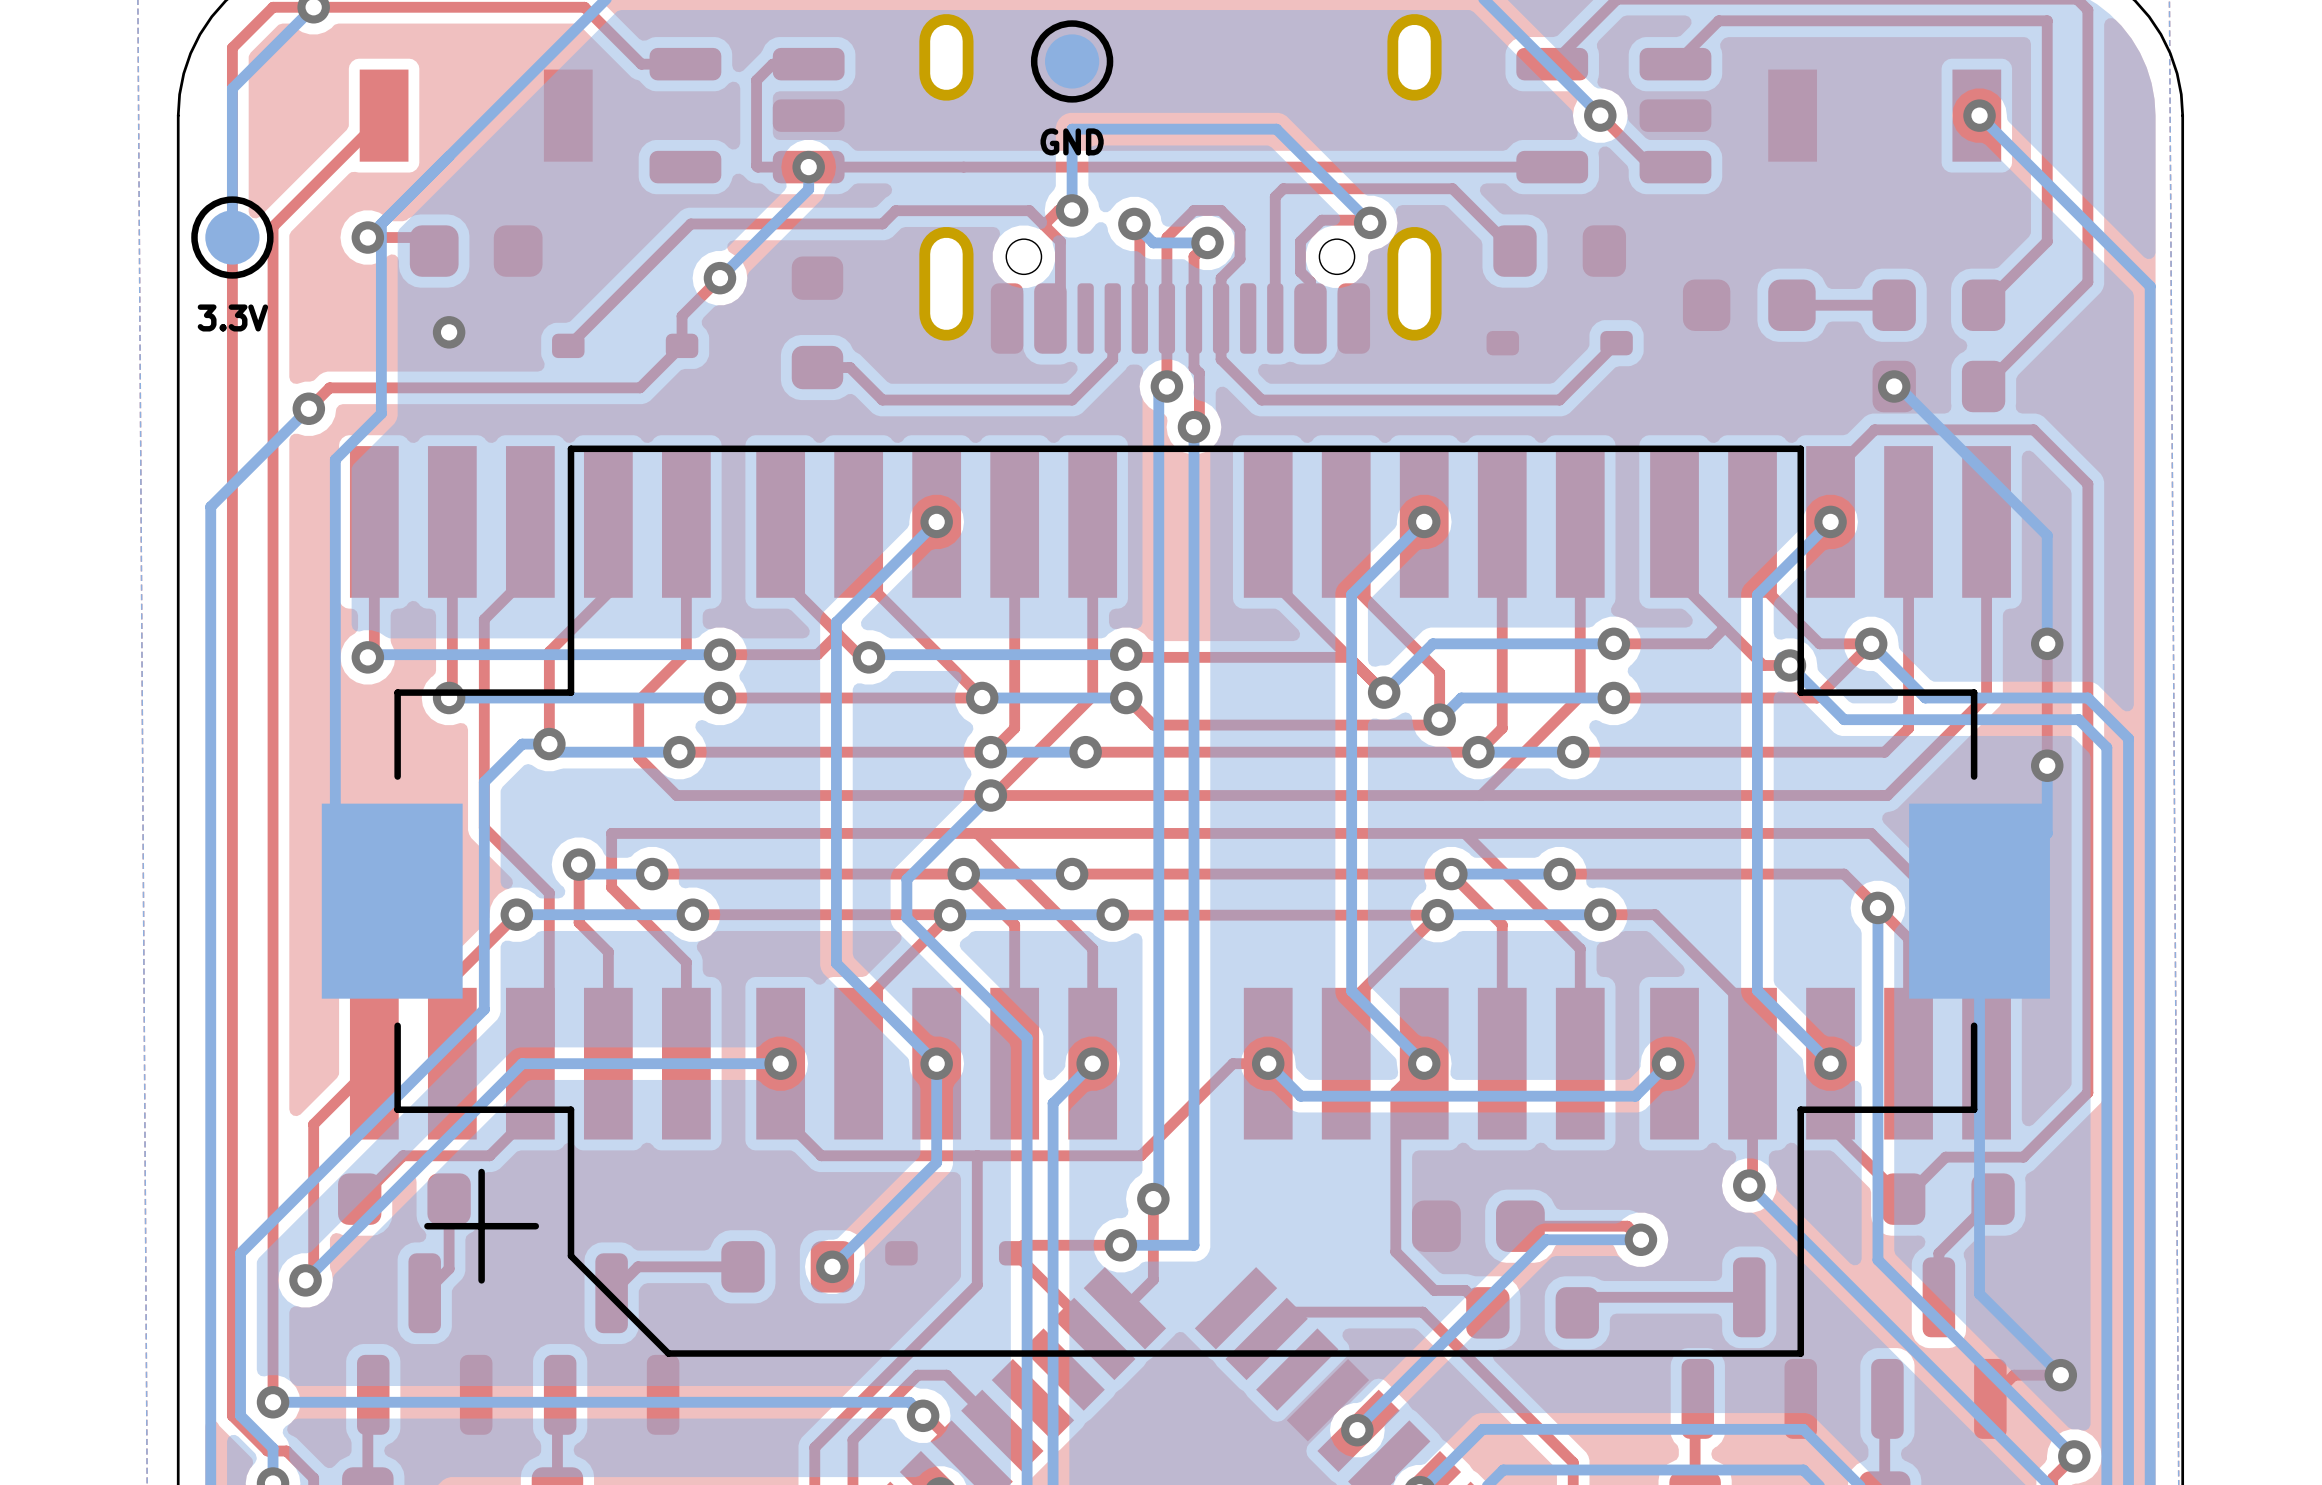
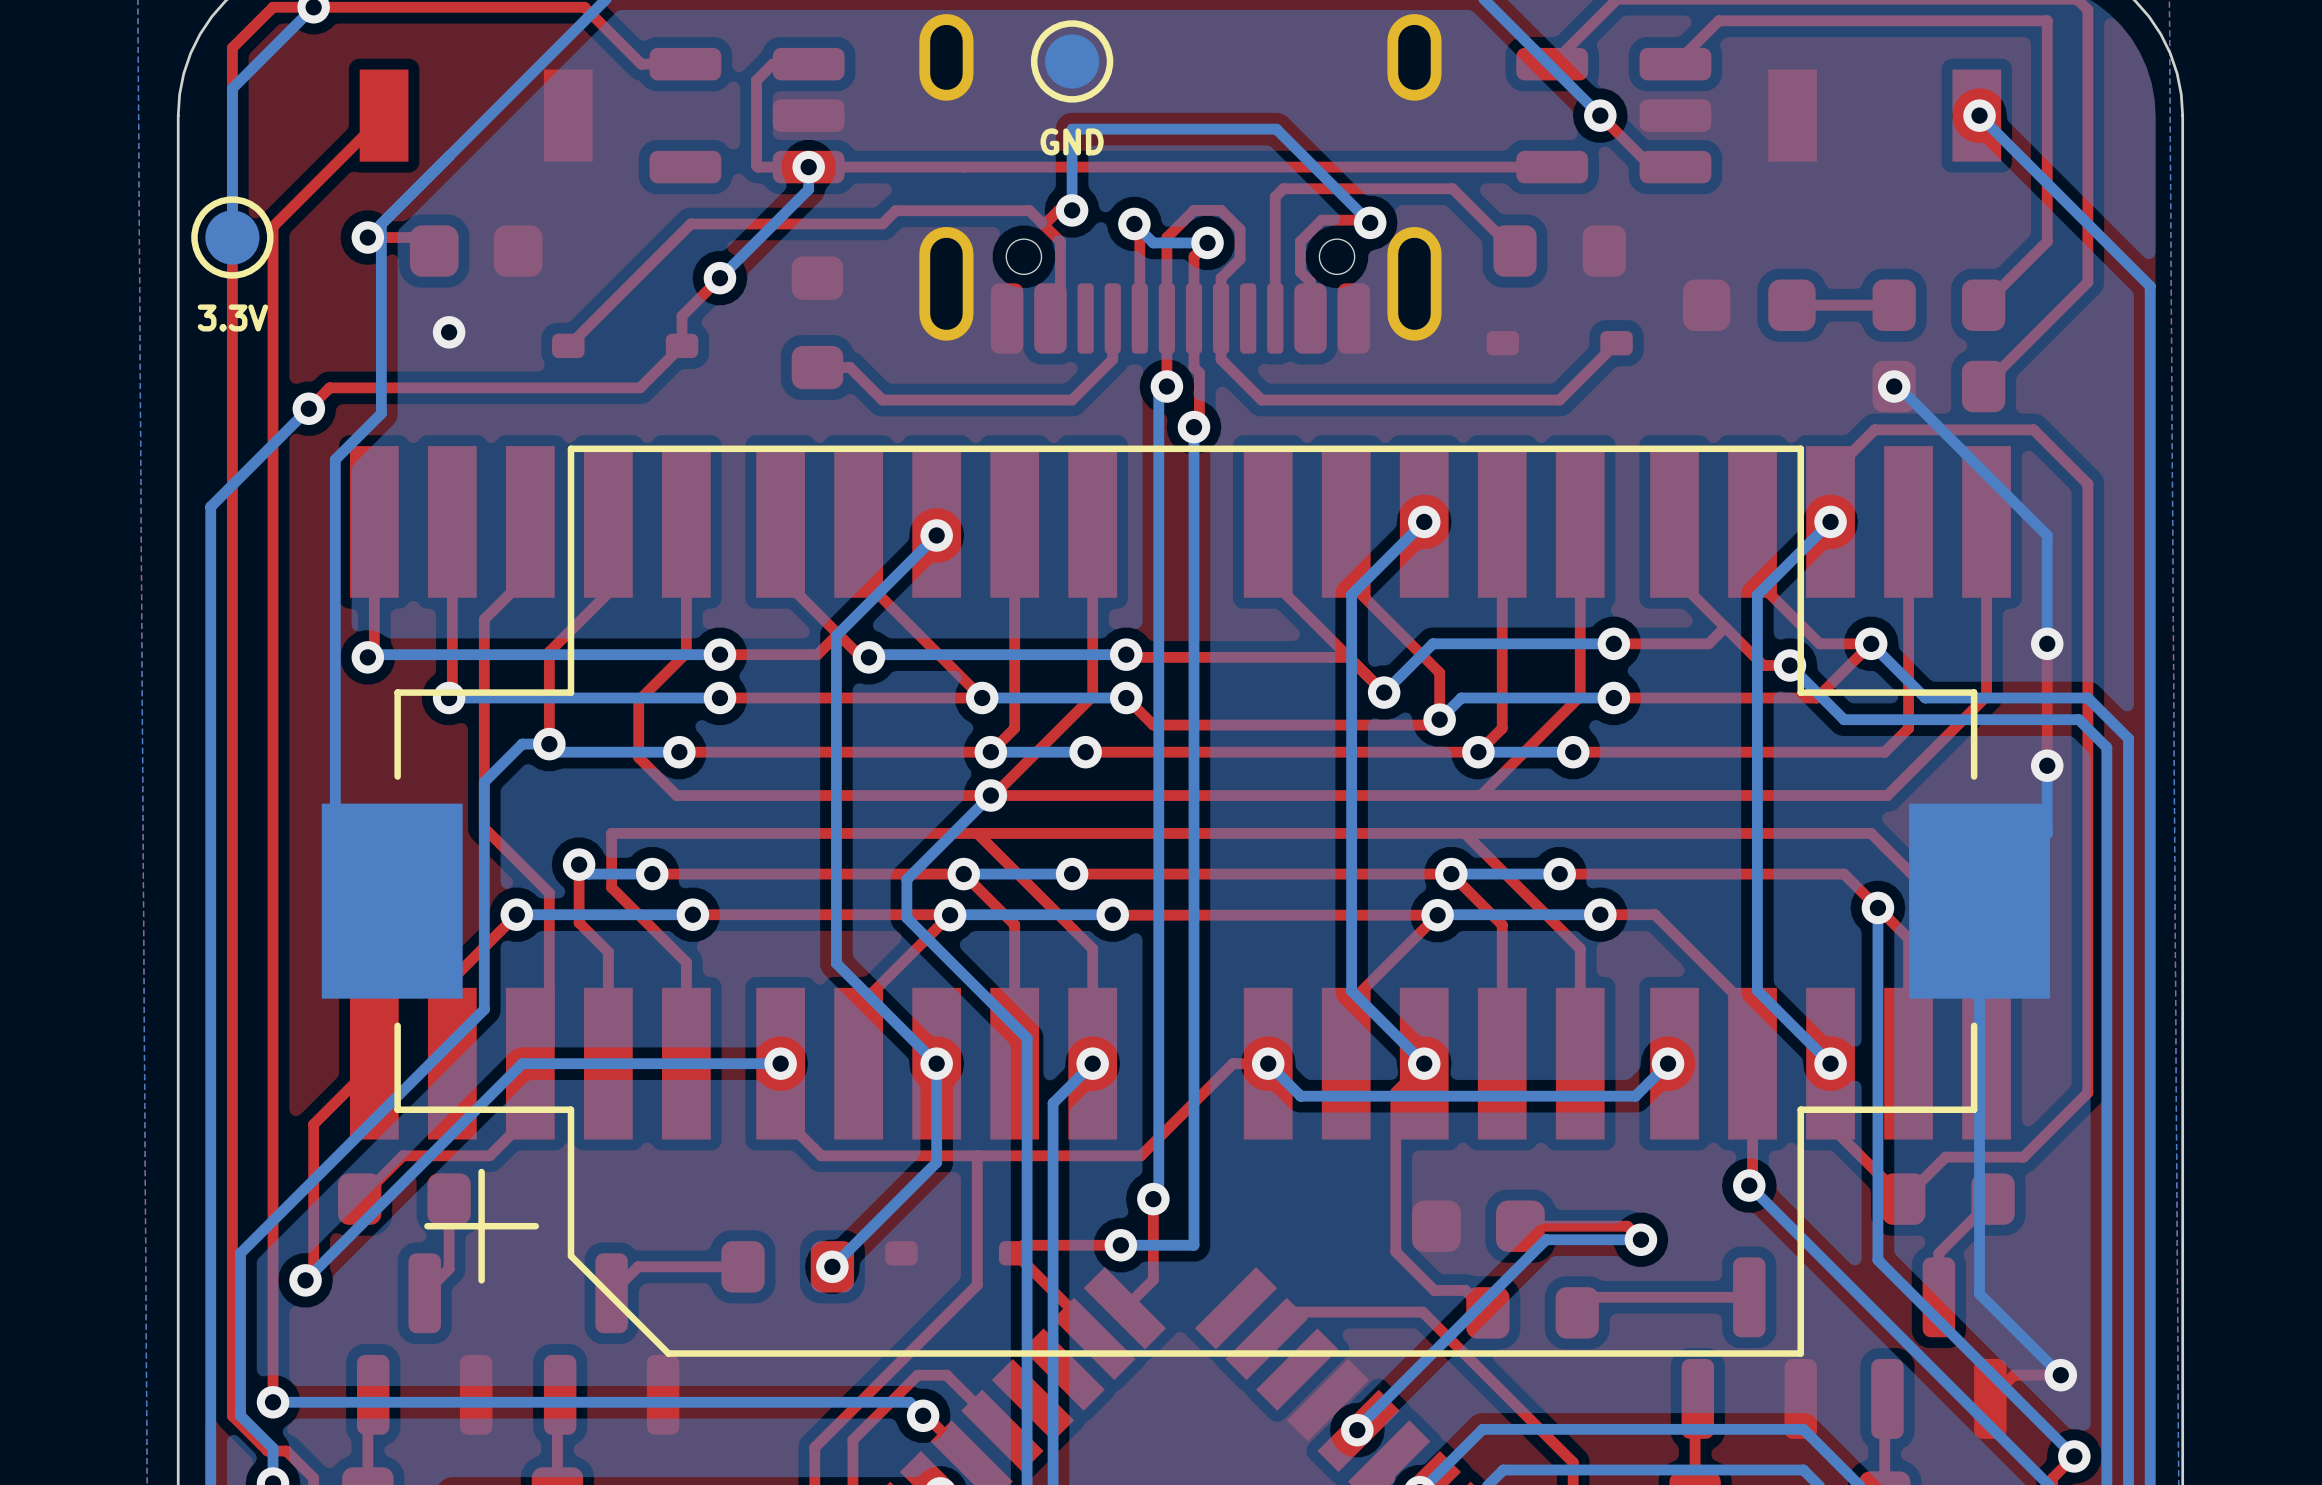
bottom track: (936, 521) (836, 622) (836, 635) -> (936, 535) (836, 635)
via position: (936, 521) -> (936, 535)

